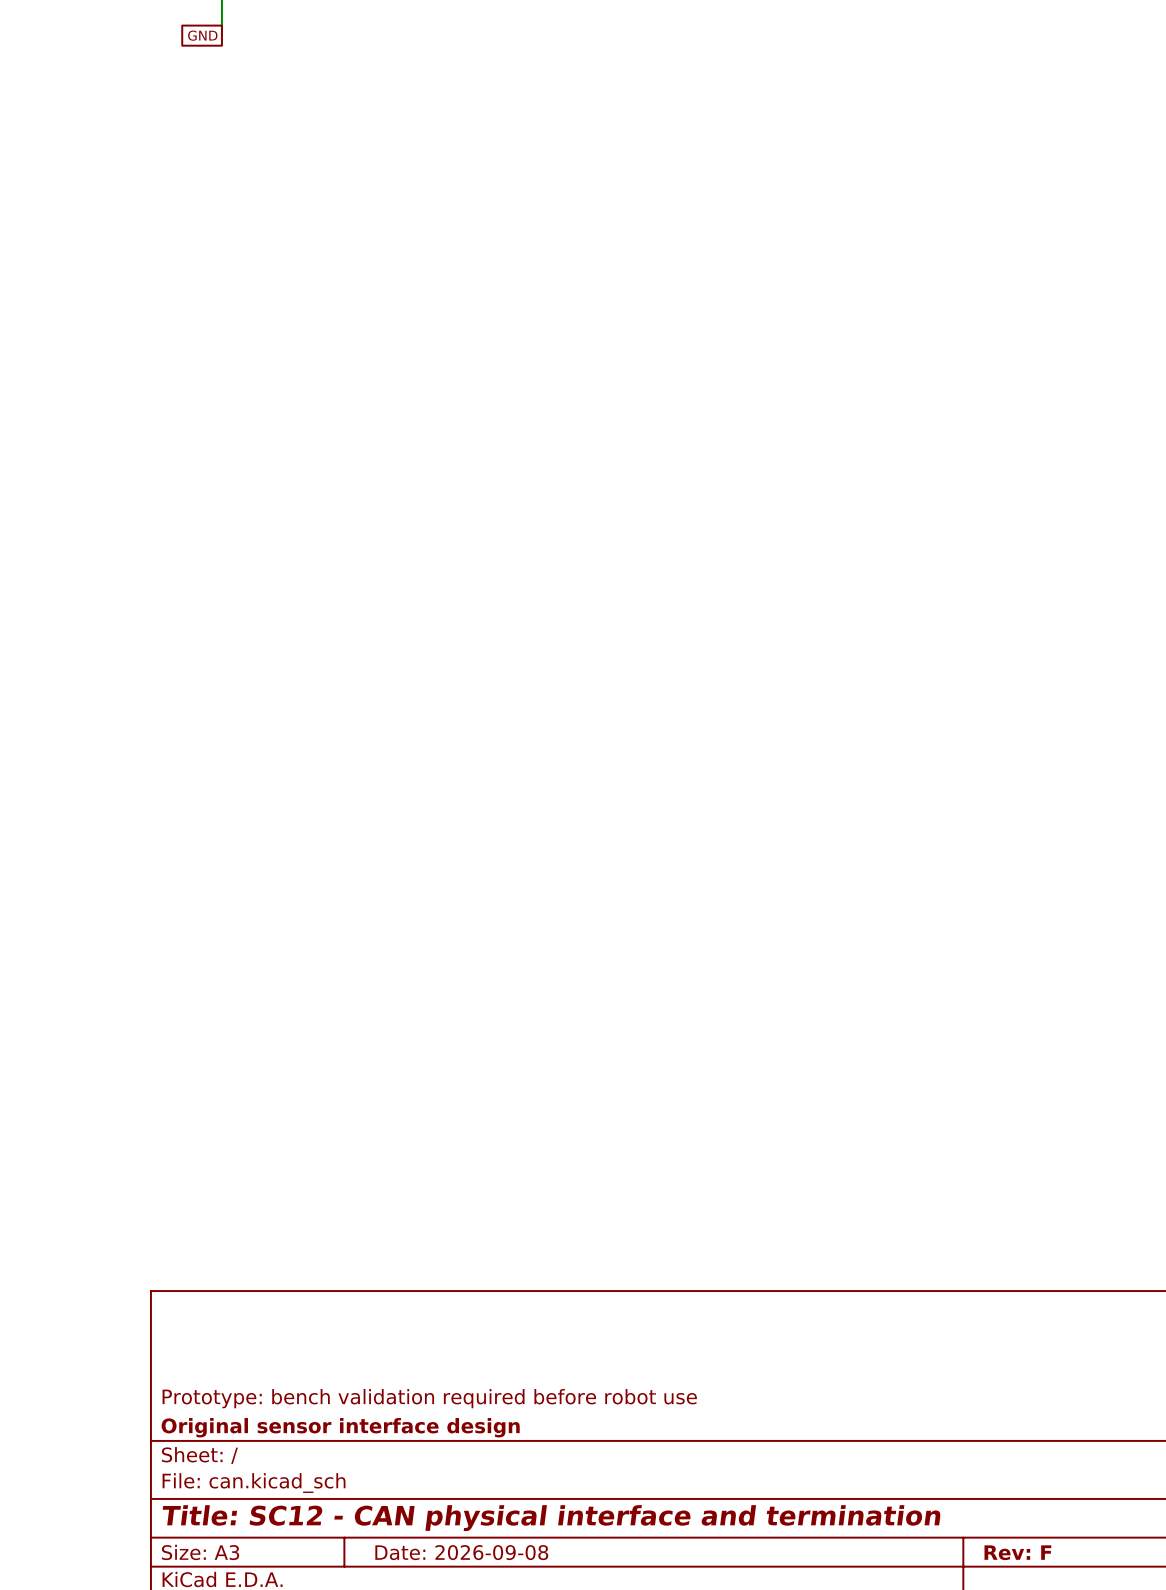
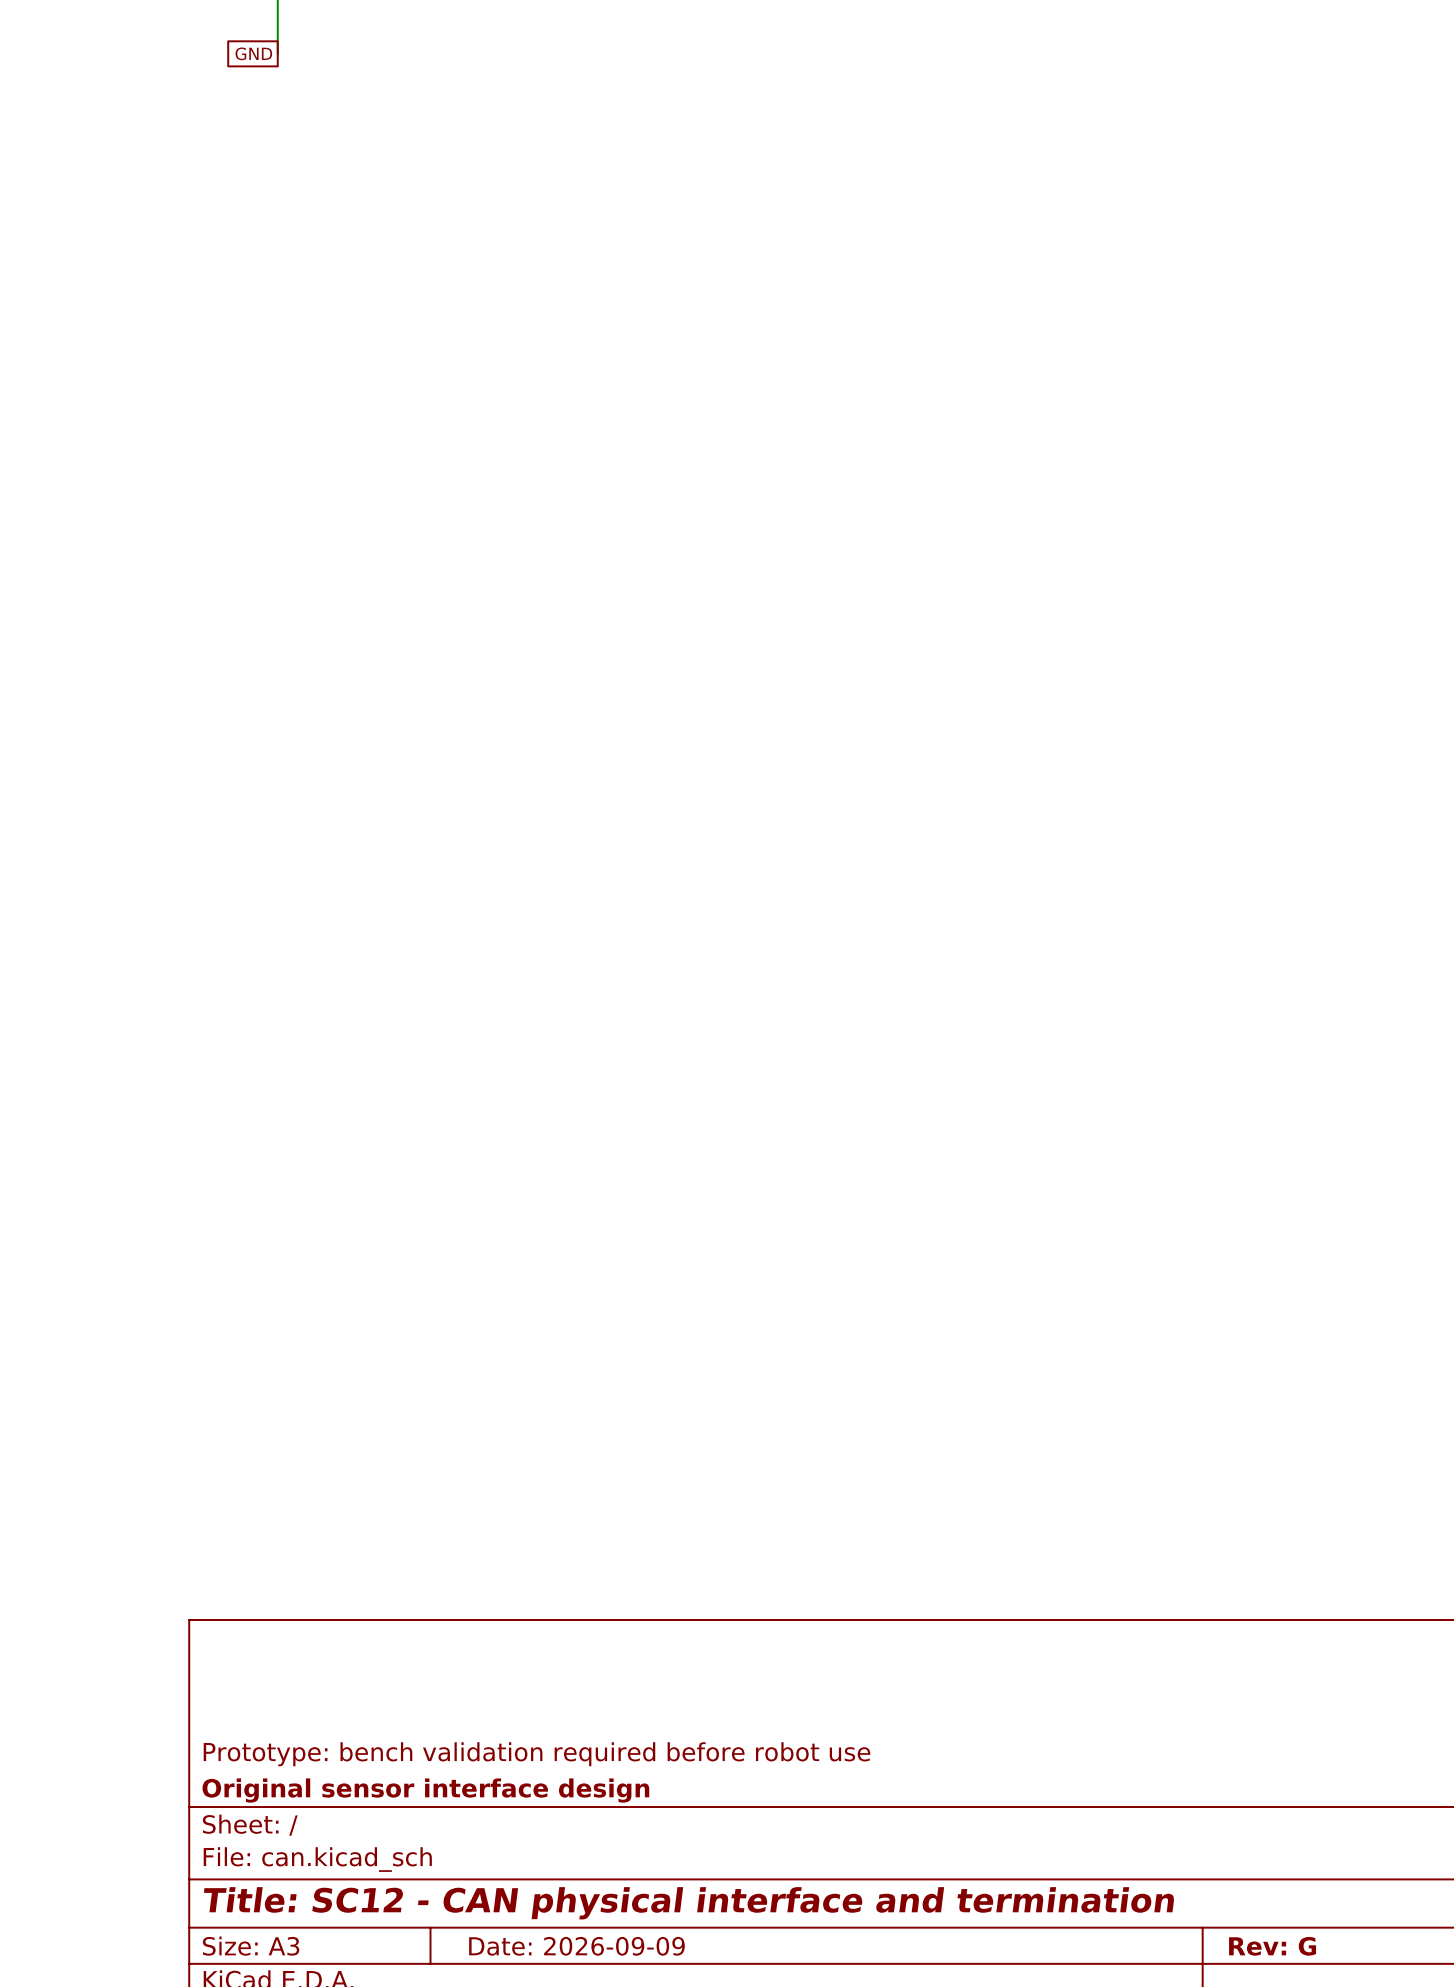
title block: Date: 2026-09-08 (461, 1552) -> Date: 2026-09-09 (576, 1946)
title block: Rev: F (1017, 1552) -> Rev: G (1272, 1946)

